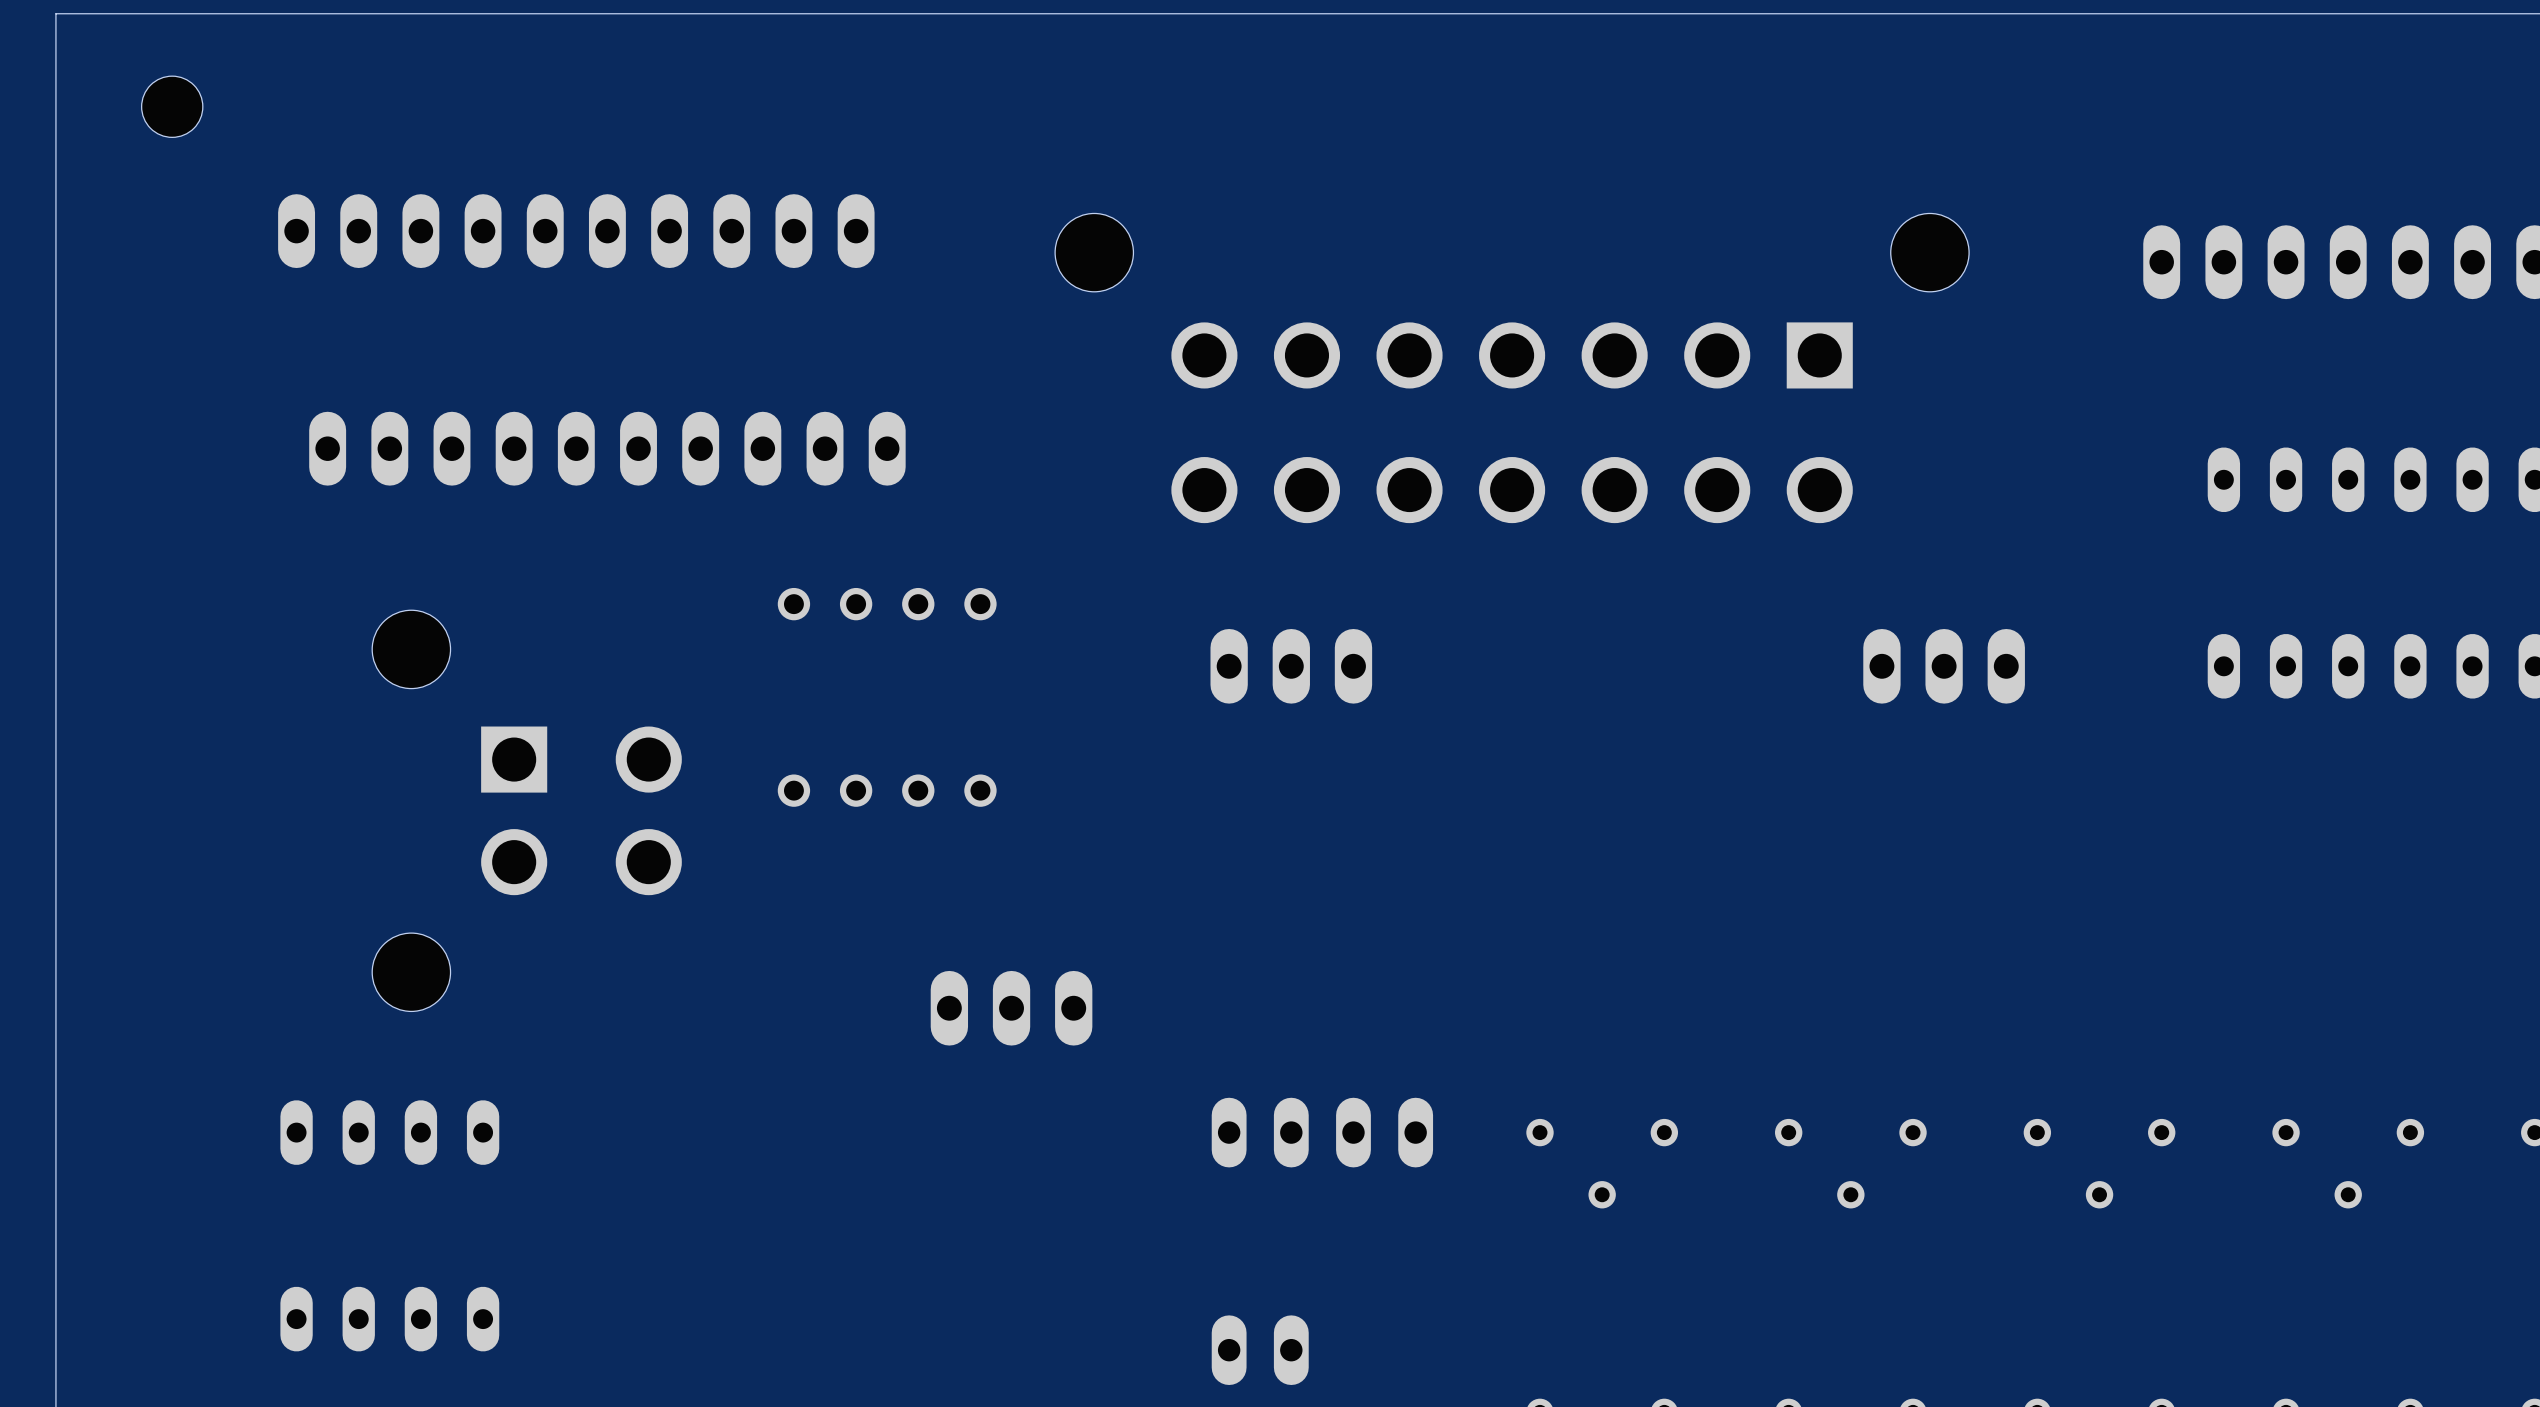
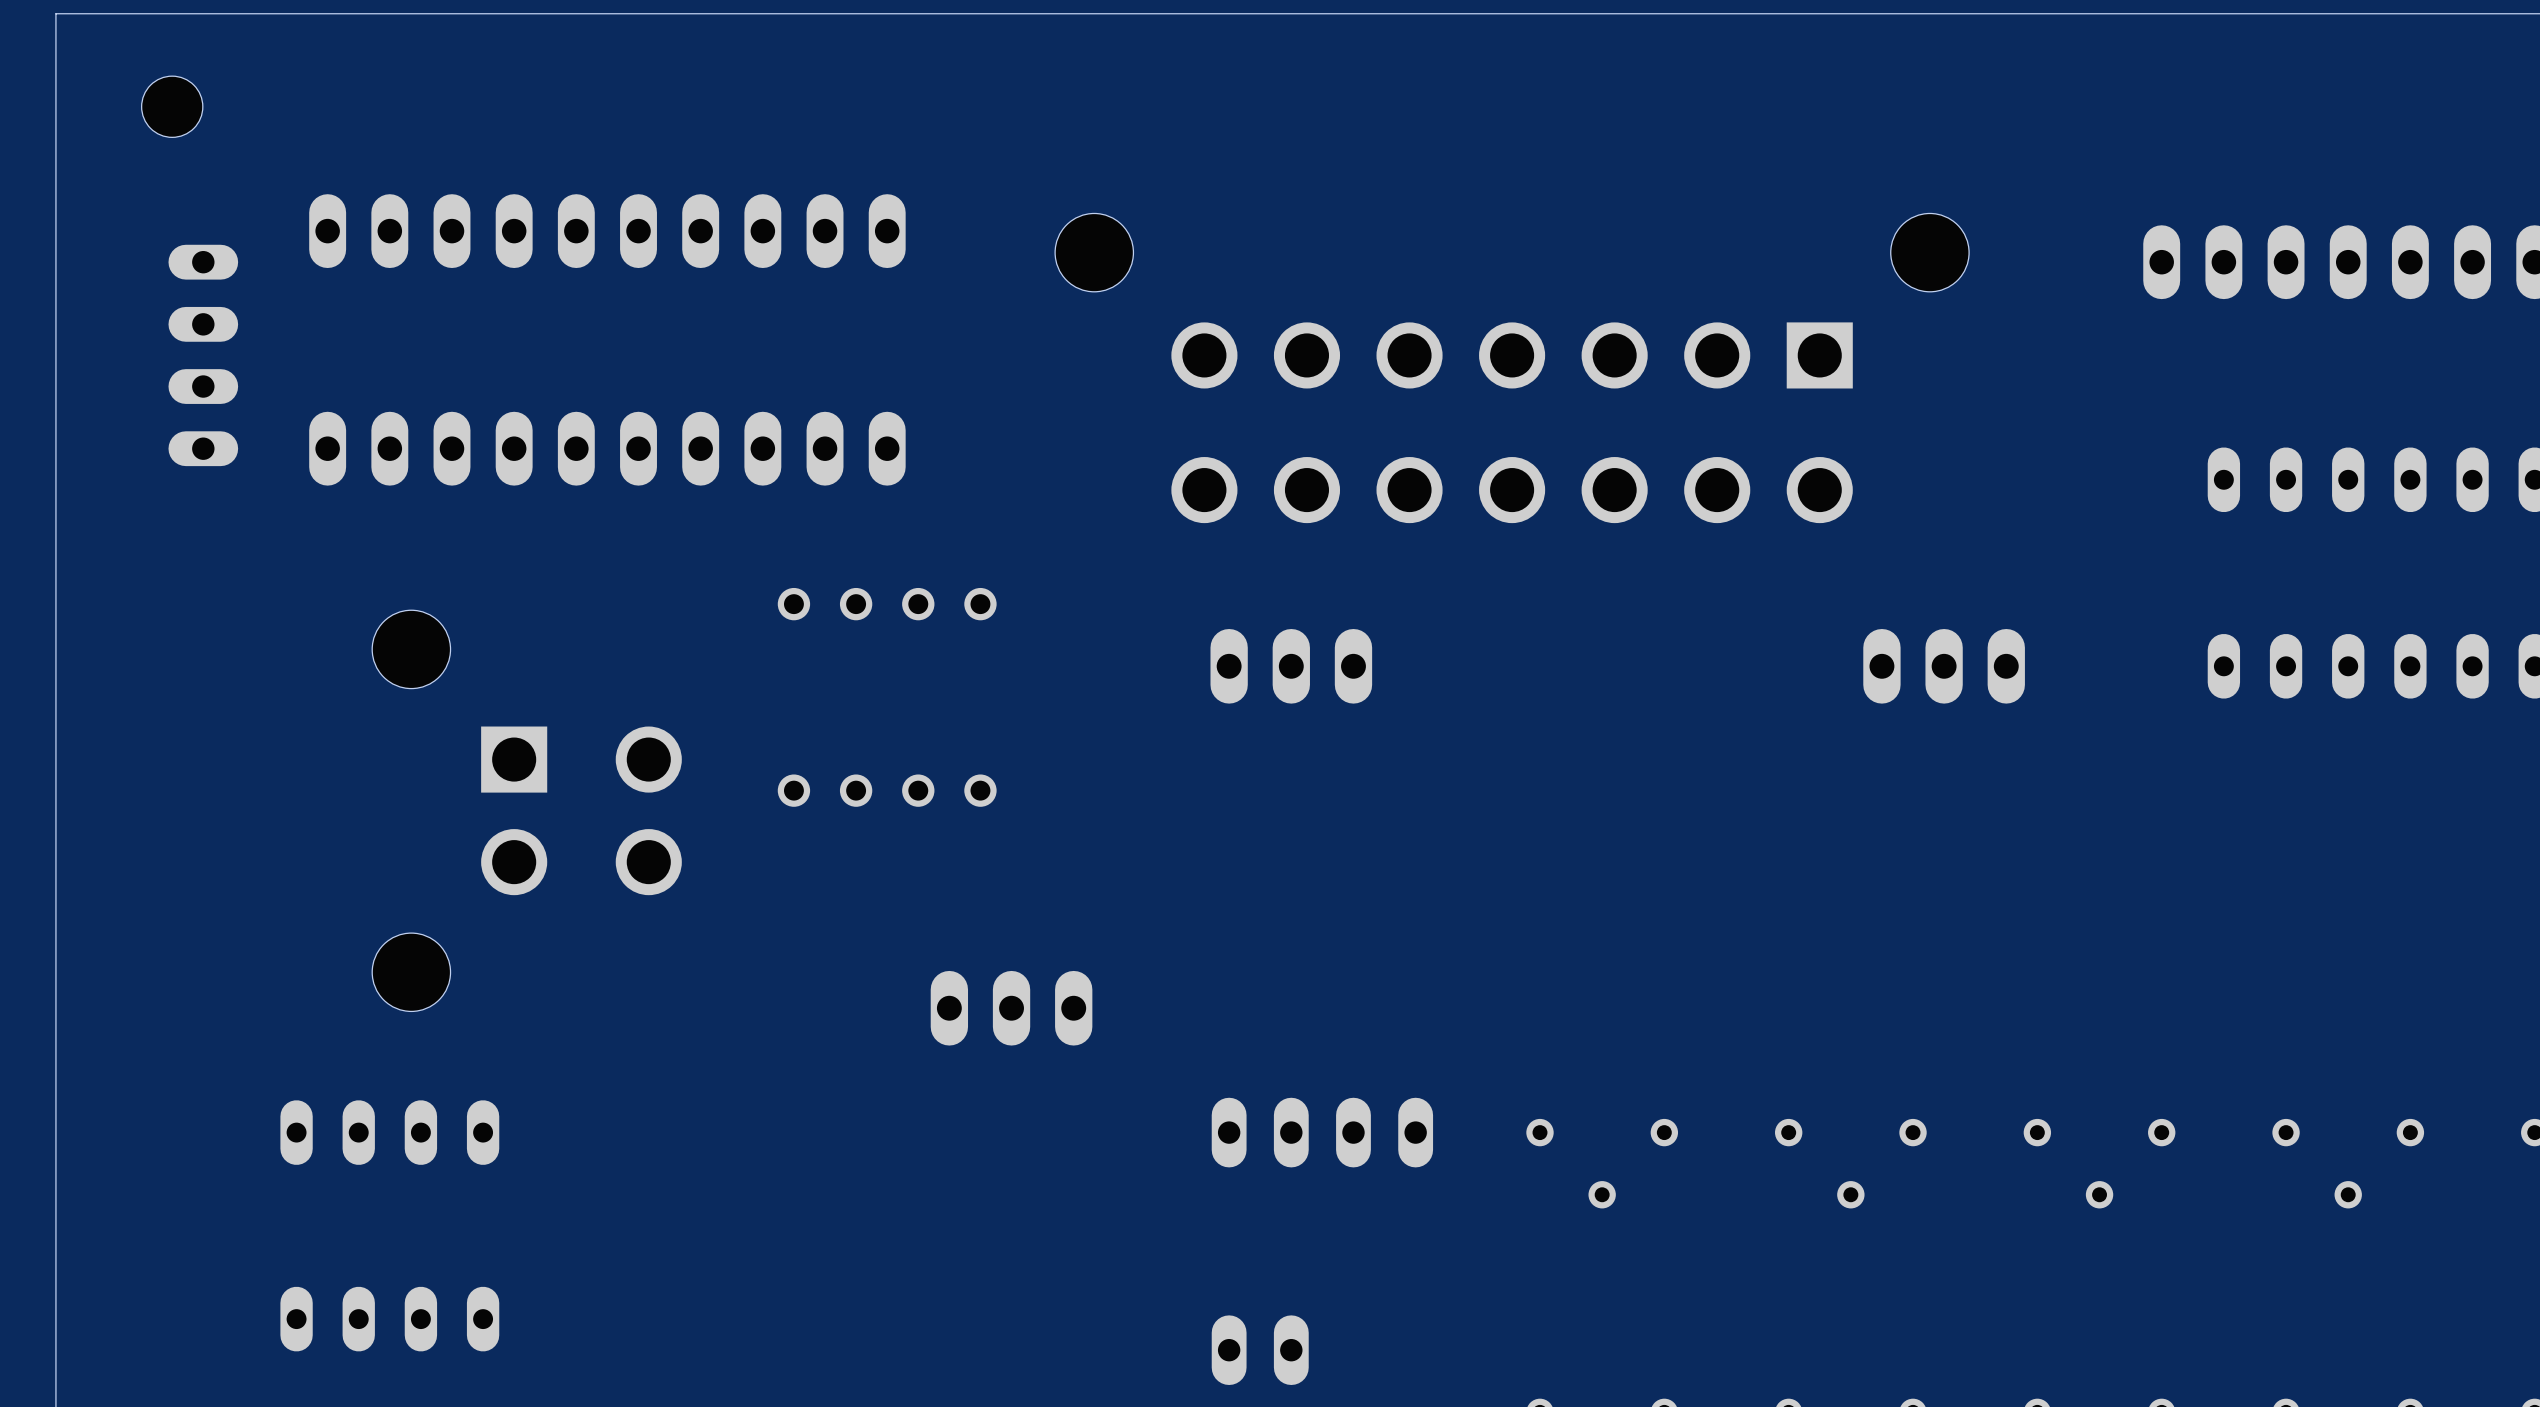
part position: (576, 231) -> (607, 231)
part: none -> (203, 355)

